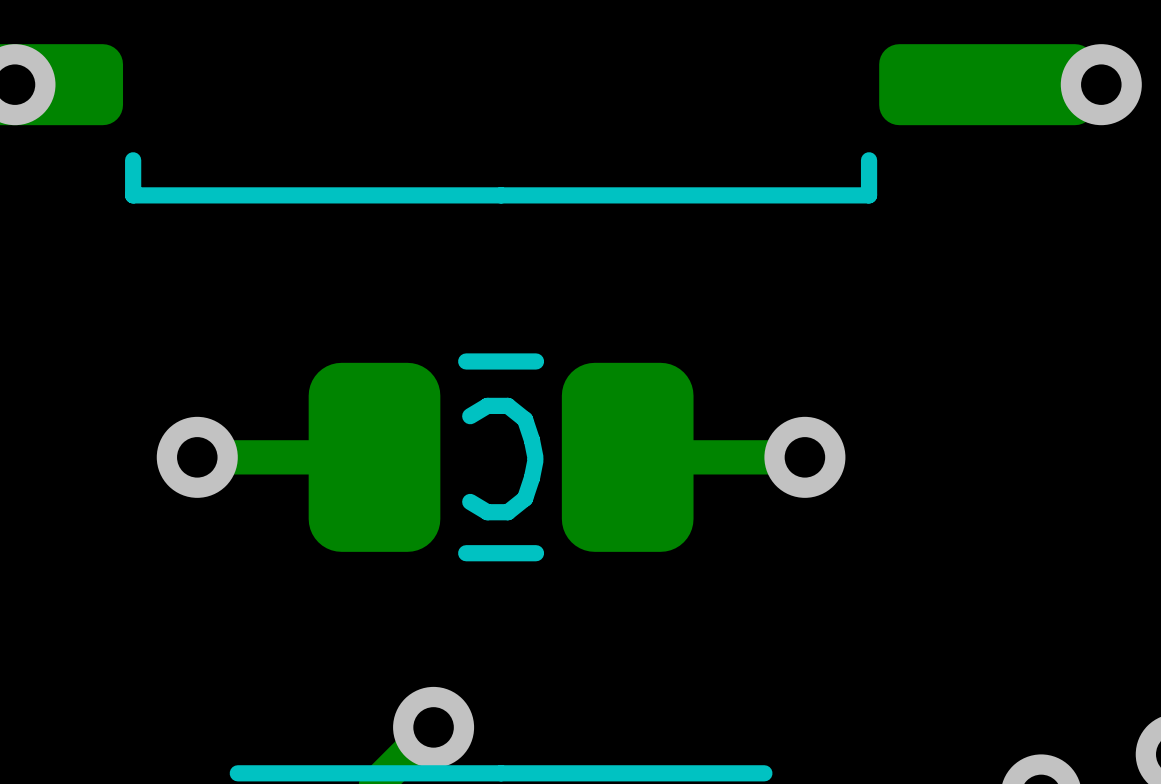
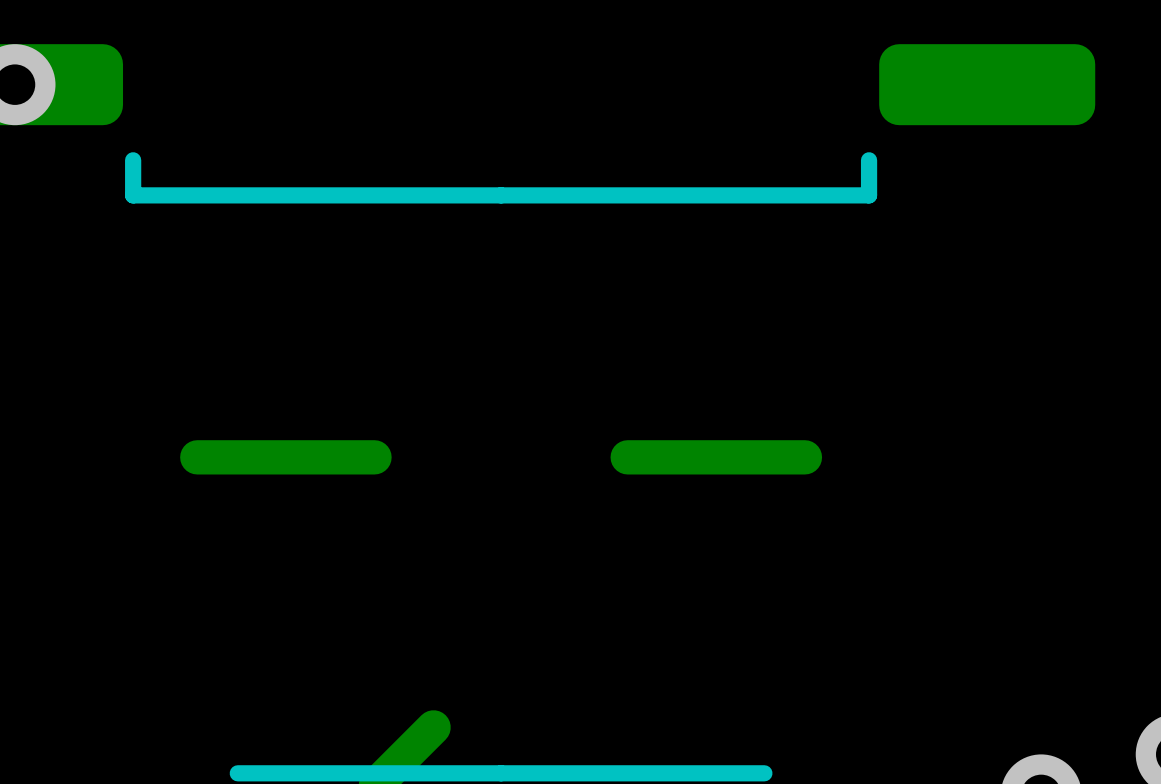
via: (1101, 84) -> none
via: (197, 457) -> none
part: (501, 457) -> none
via: (804, 457) -> none
via: (433, 727) -> none

